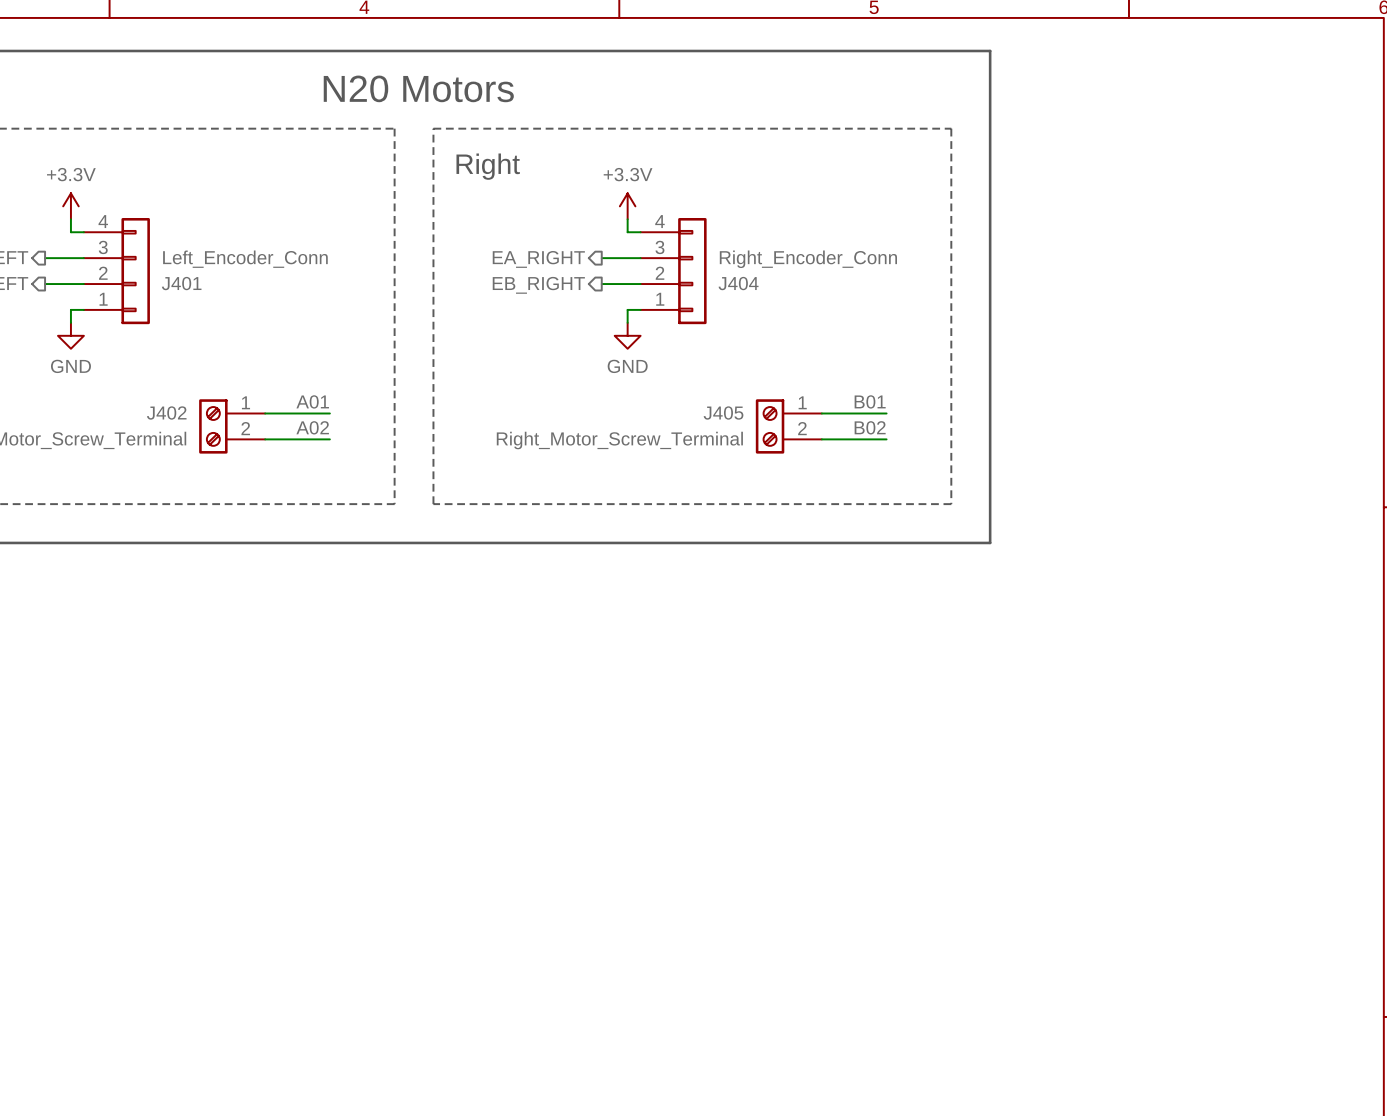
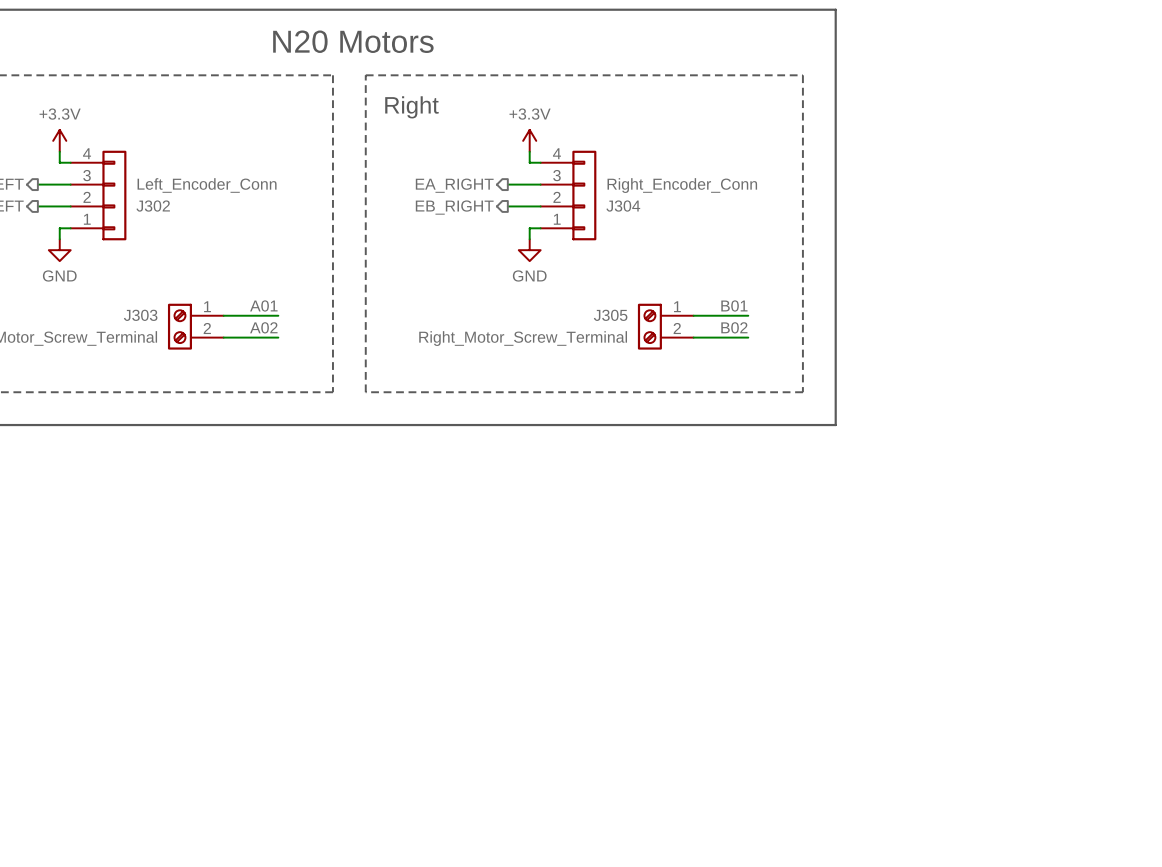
J401 name: J401 (181, 283) -> J302 (153, 206)
J404 name: J404 (738, 283) -> J304 (623, 206)
J402 name: J402 (166, 413) -> J303 (140, 315)
J405 name: J405 (723, 413) -> J305 (610, 315)

